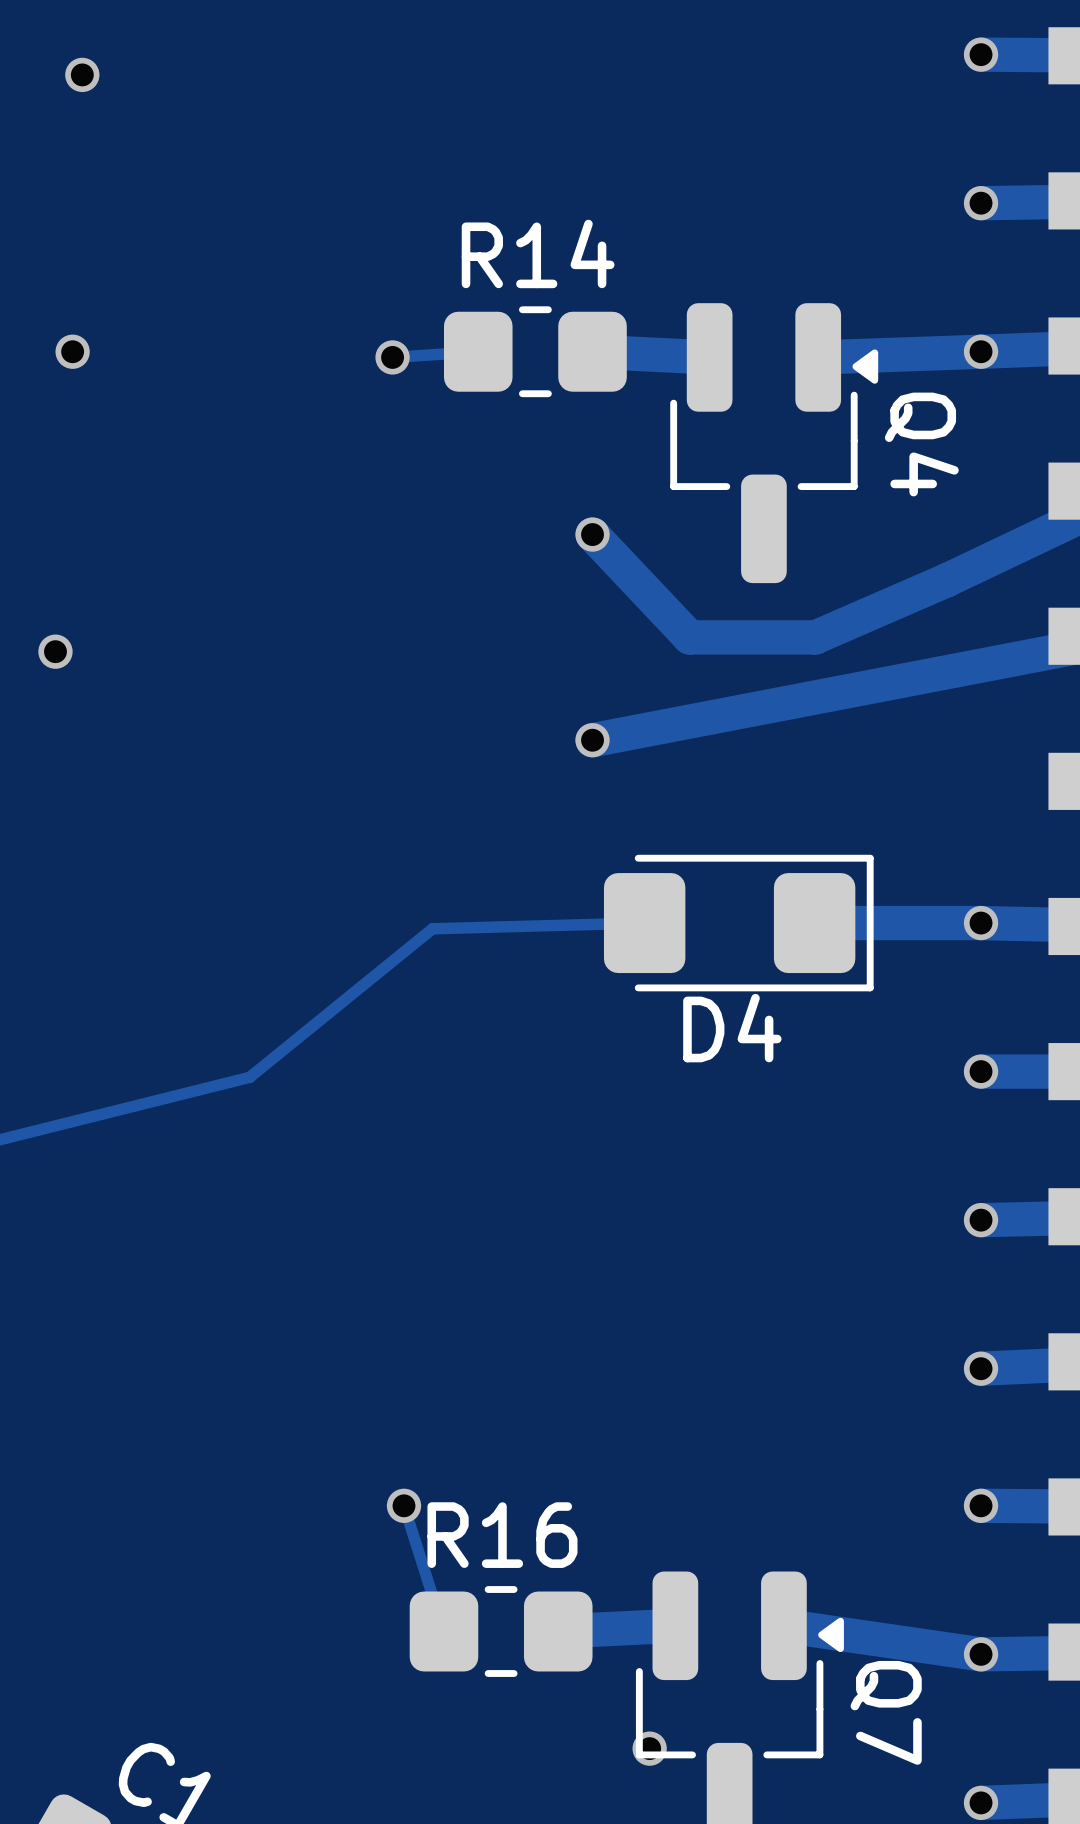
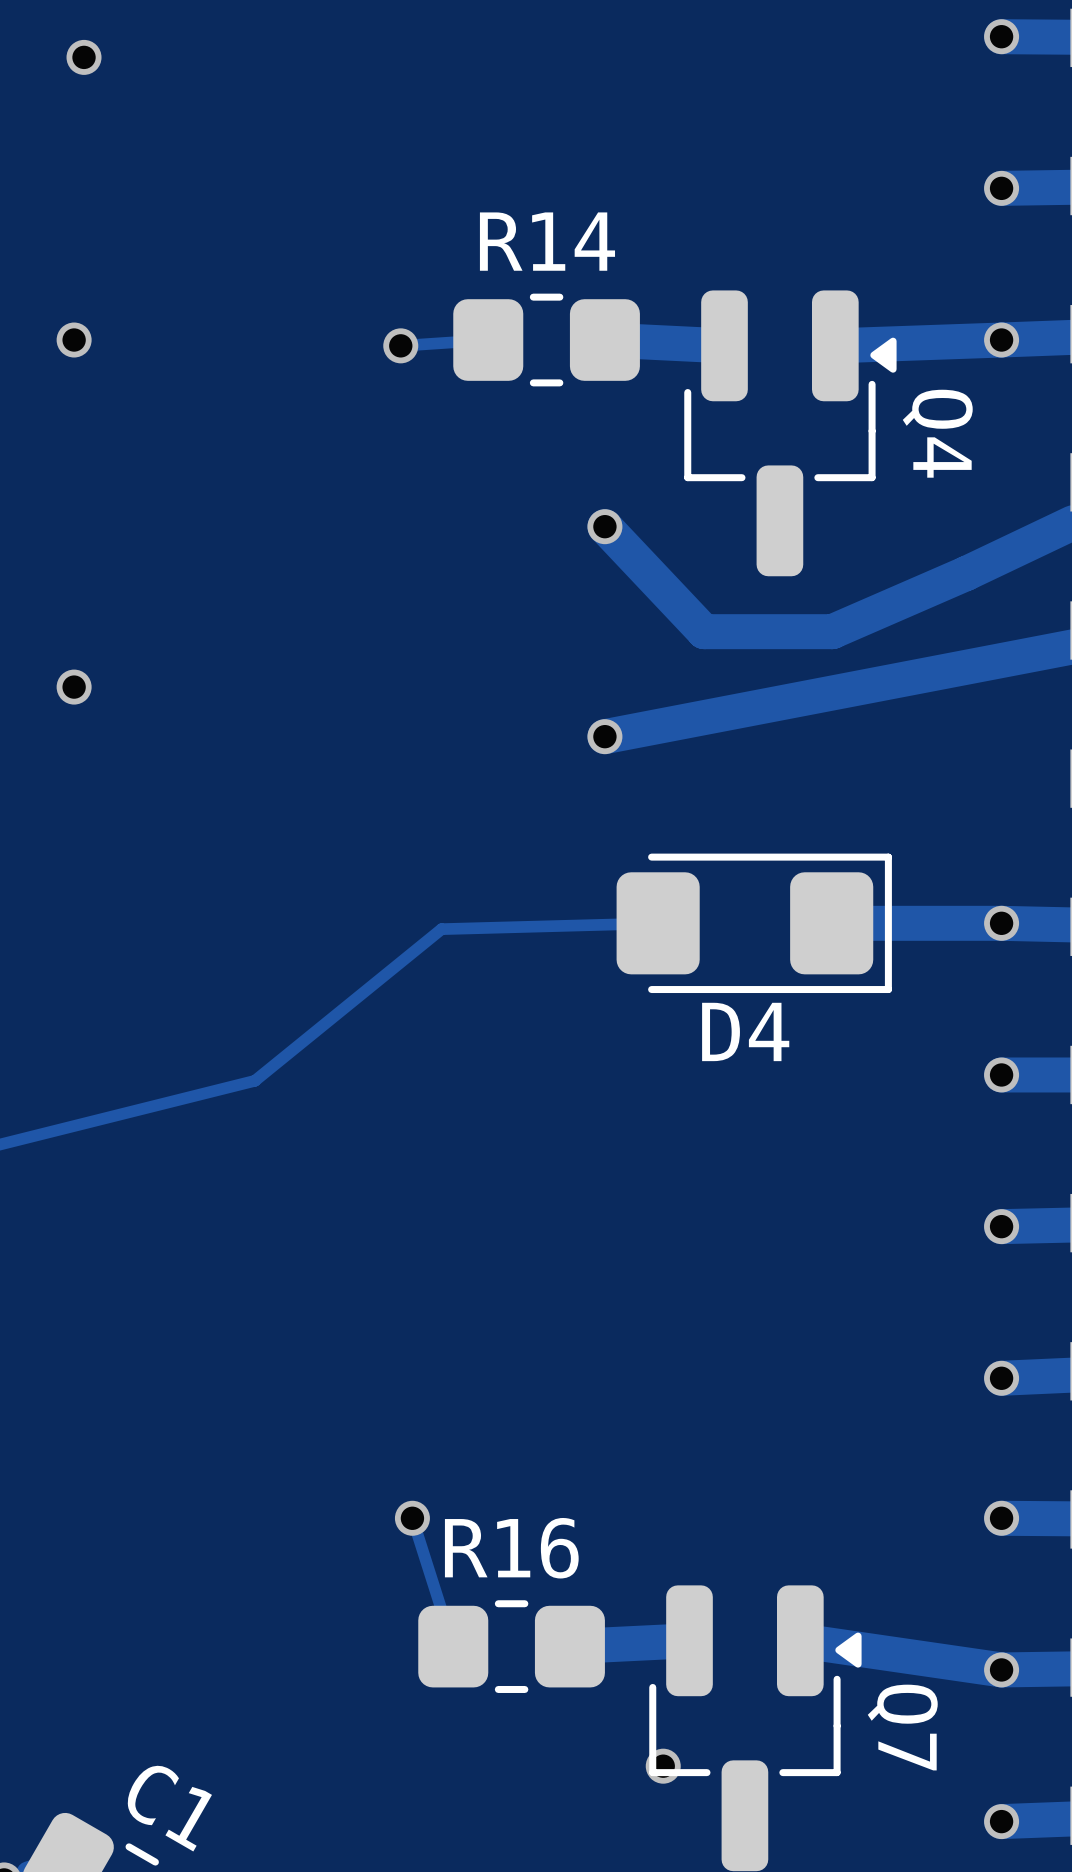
via position: (55, 651) -> (74, 687)

